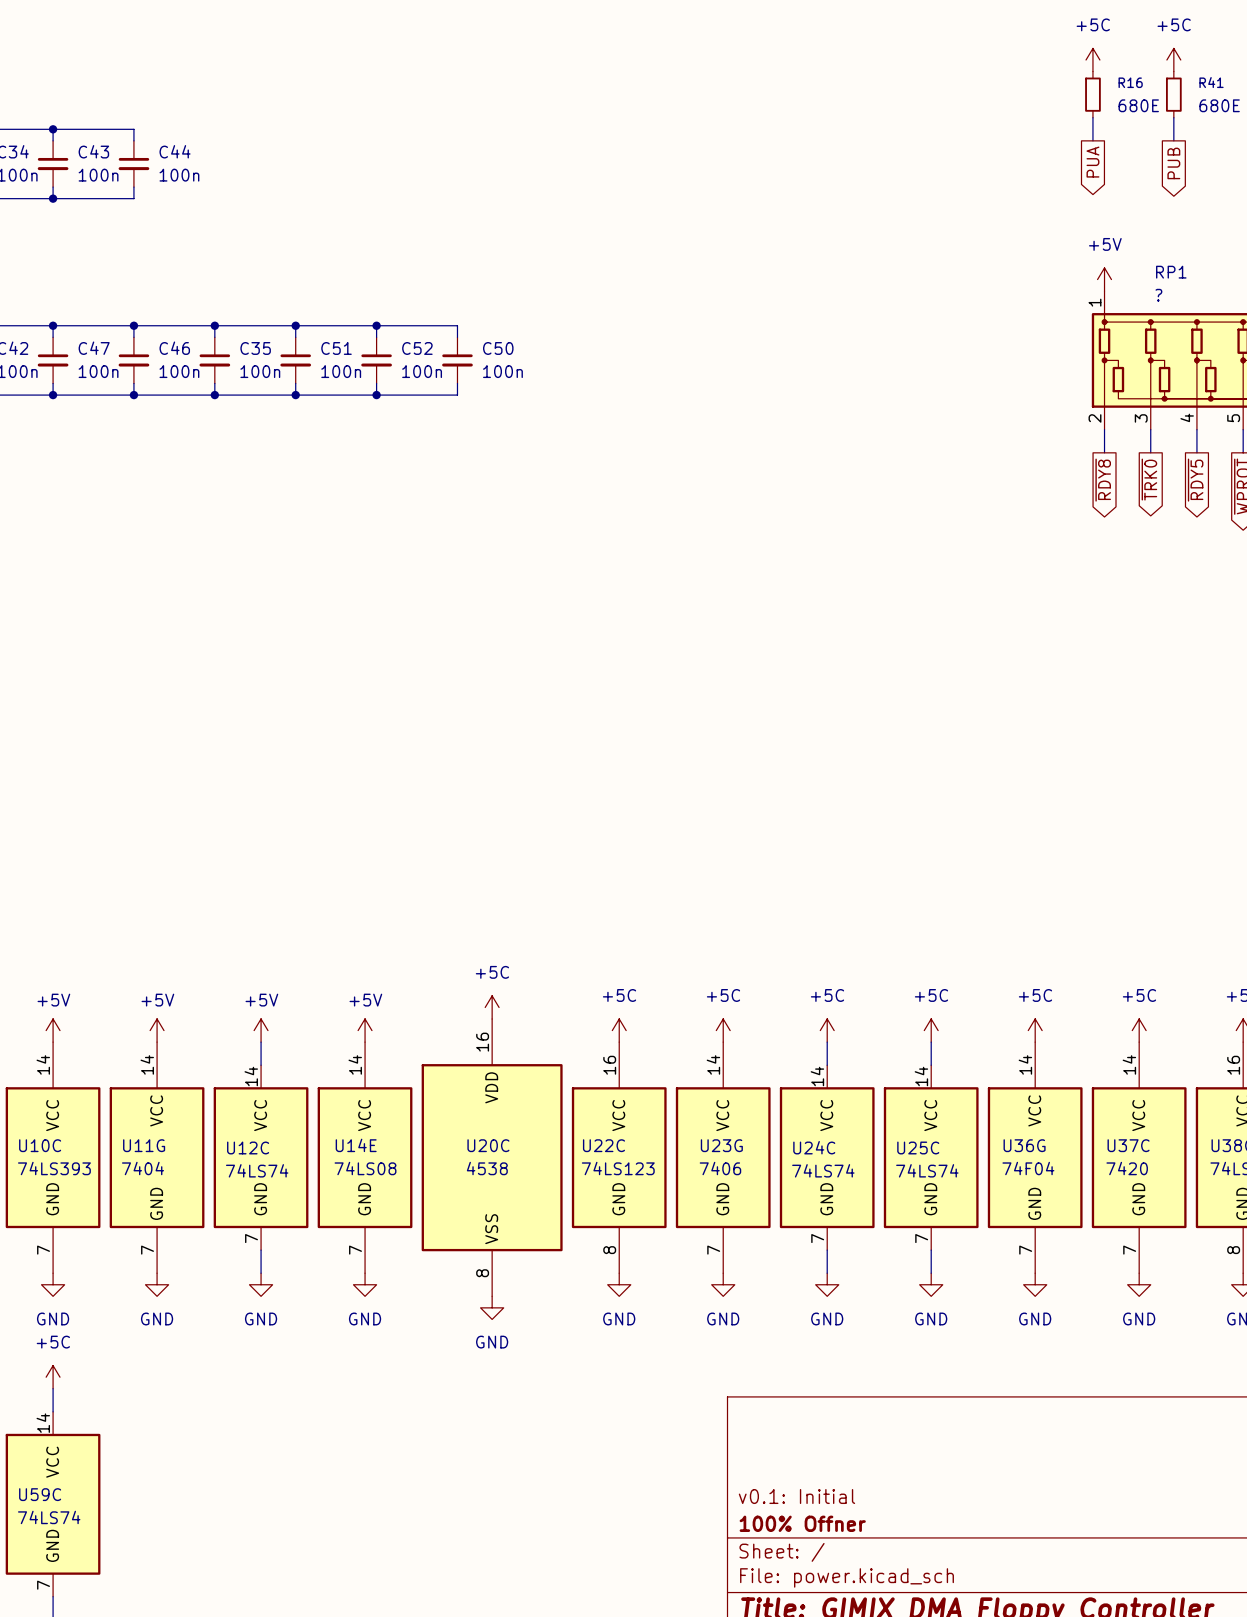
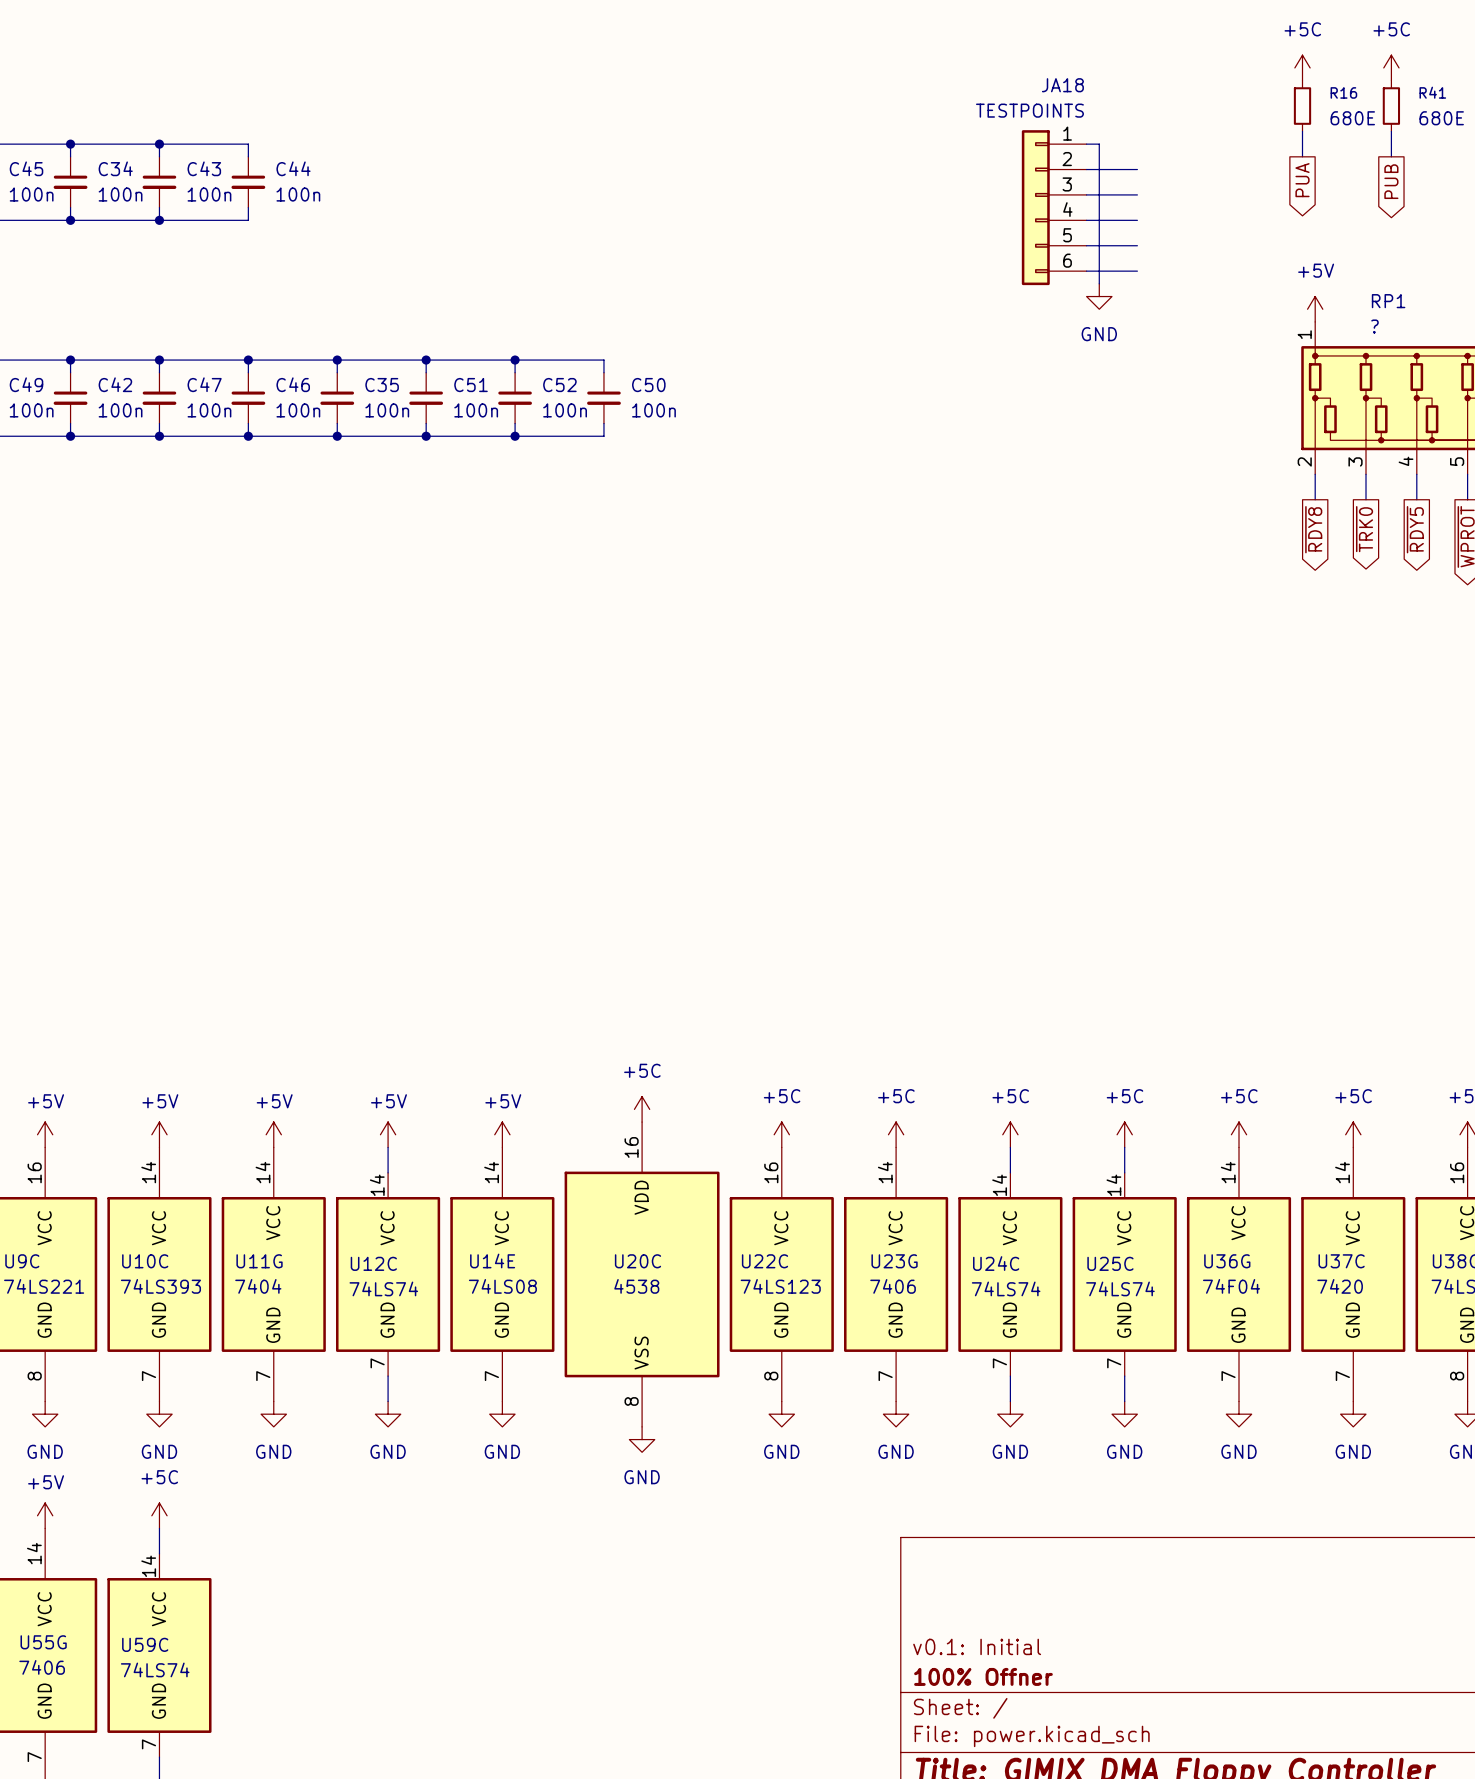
wire: none -> (1086, 144) (1099, 144) (1099, 283)
wire: none -> (1086, 169) (1137, 169)
wire: none -> (1086, 194) (1137, 194)
JA18: none -> TESTPOINTS (1054, 207)
wire: none -> (1086, 220) (1137, 220)
wire: none -> (1086, 245) (1137, 245)
wire: none -> (1086, 271) (1137, 271)
power symbol: none -> GND (1099, 296)

